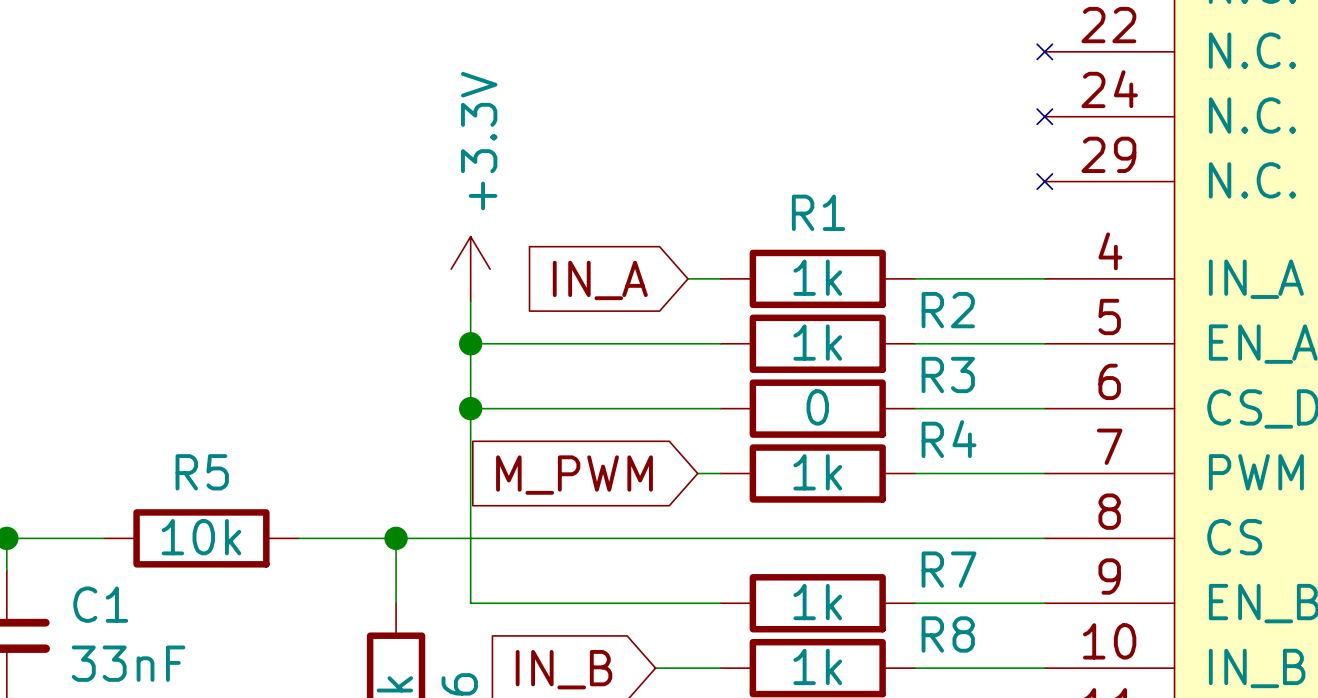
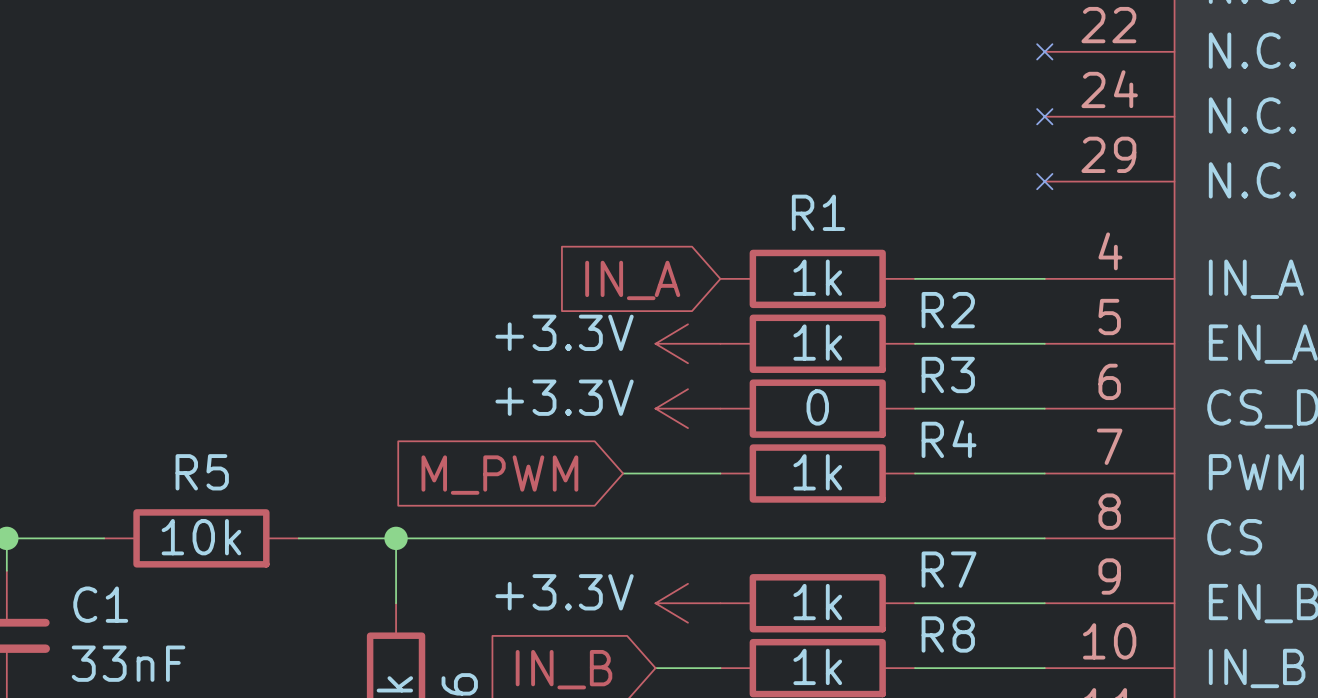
power symbol: +3.3V (470, 269) -> none
wire: (687, 278) (720, 278) -> none
global label position: IN_A (600, 280) -> IN_A (632, 280)
wire: (470, 301) (470, 603) (720, 603) -> none
wire: (470, 343) (720, 343) -> none
junction: (470, 343) -> none
power symbol: none -> +3.3V (687, 343)
wire: (470, 408) (720, 408) -> none
junction: (470, 408) -> none
power symbol: none -> +3.3V (687, 408)
wire: none -> (623, 473) (697, 473)
global label position: M_PWM (574, 475) -> M_PWM (499, 475)
power symbol: none -> +3.3V (687, 603)

